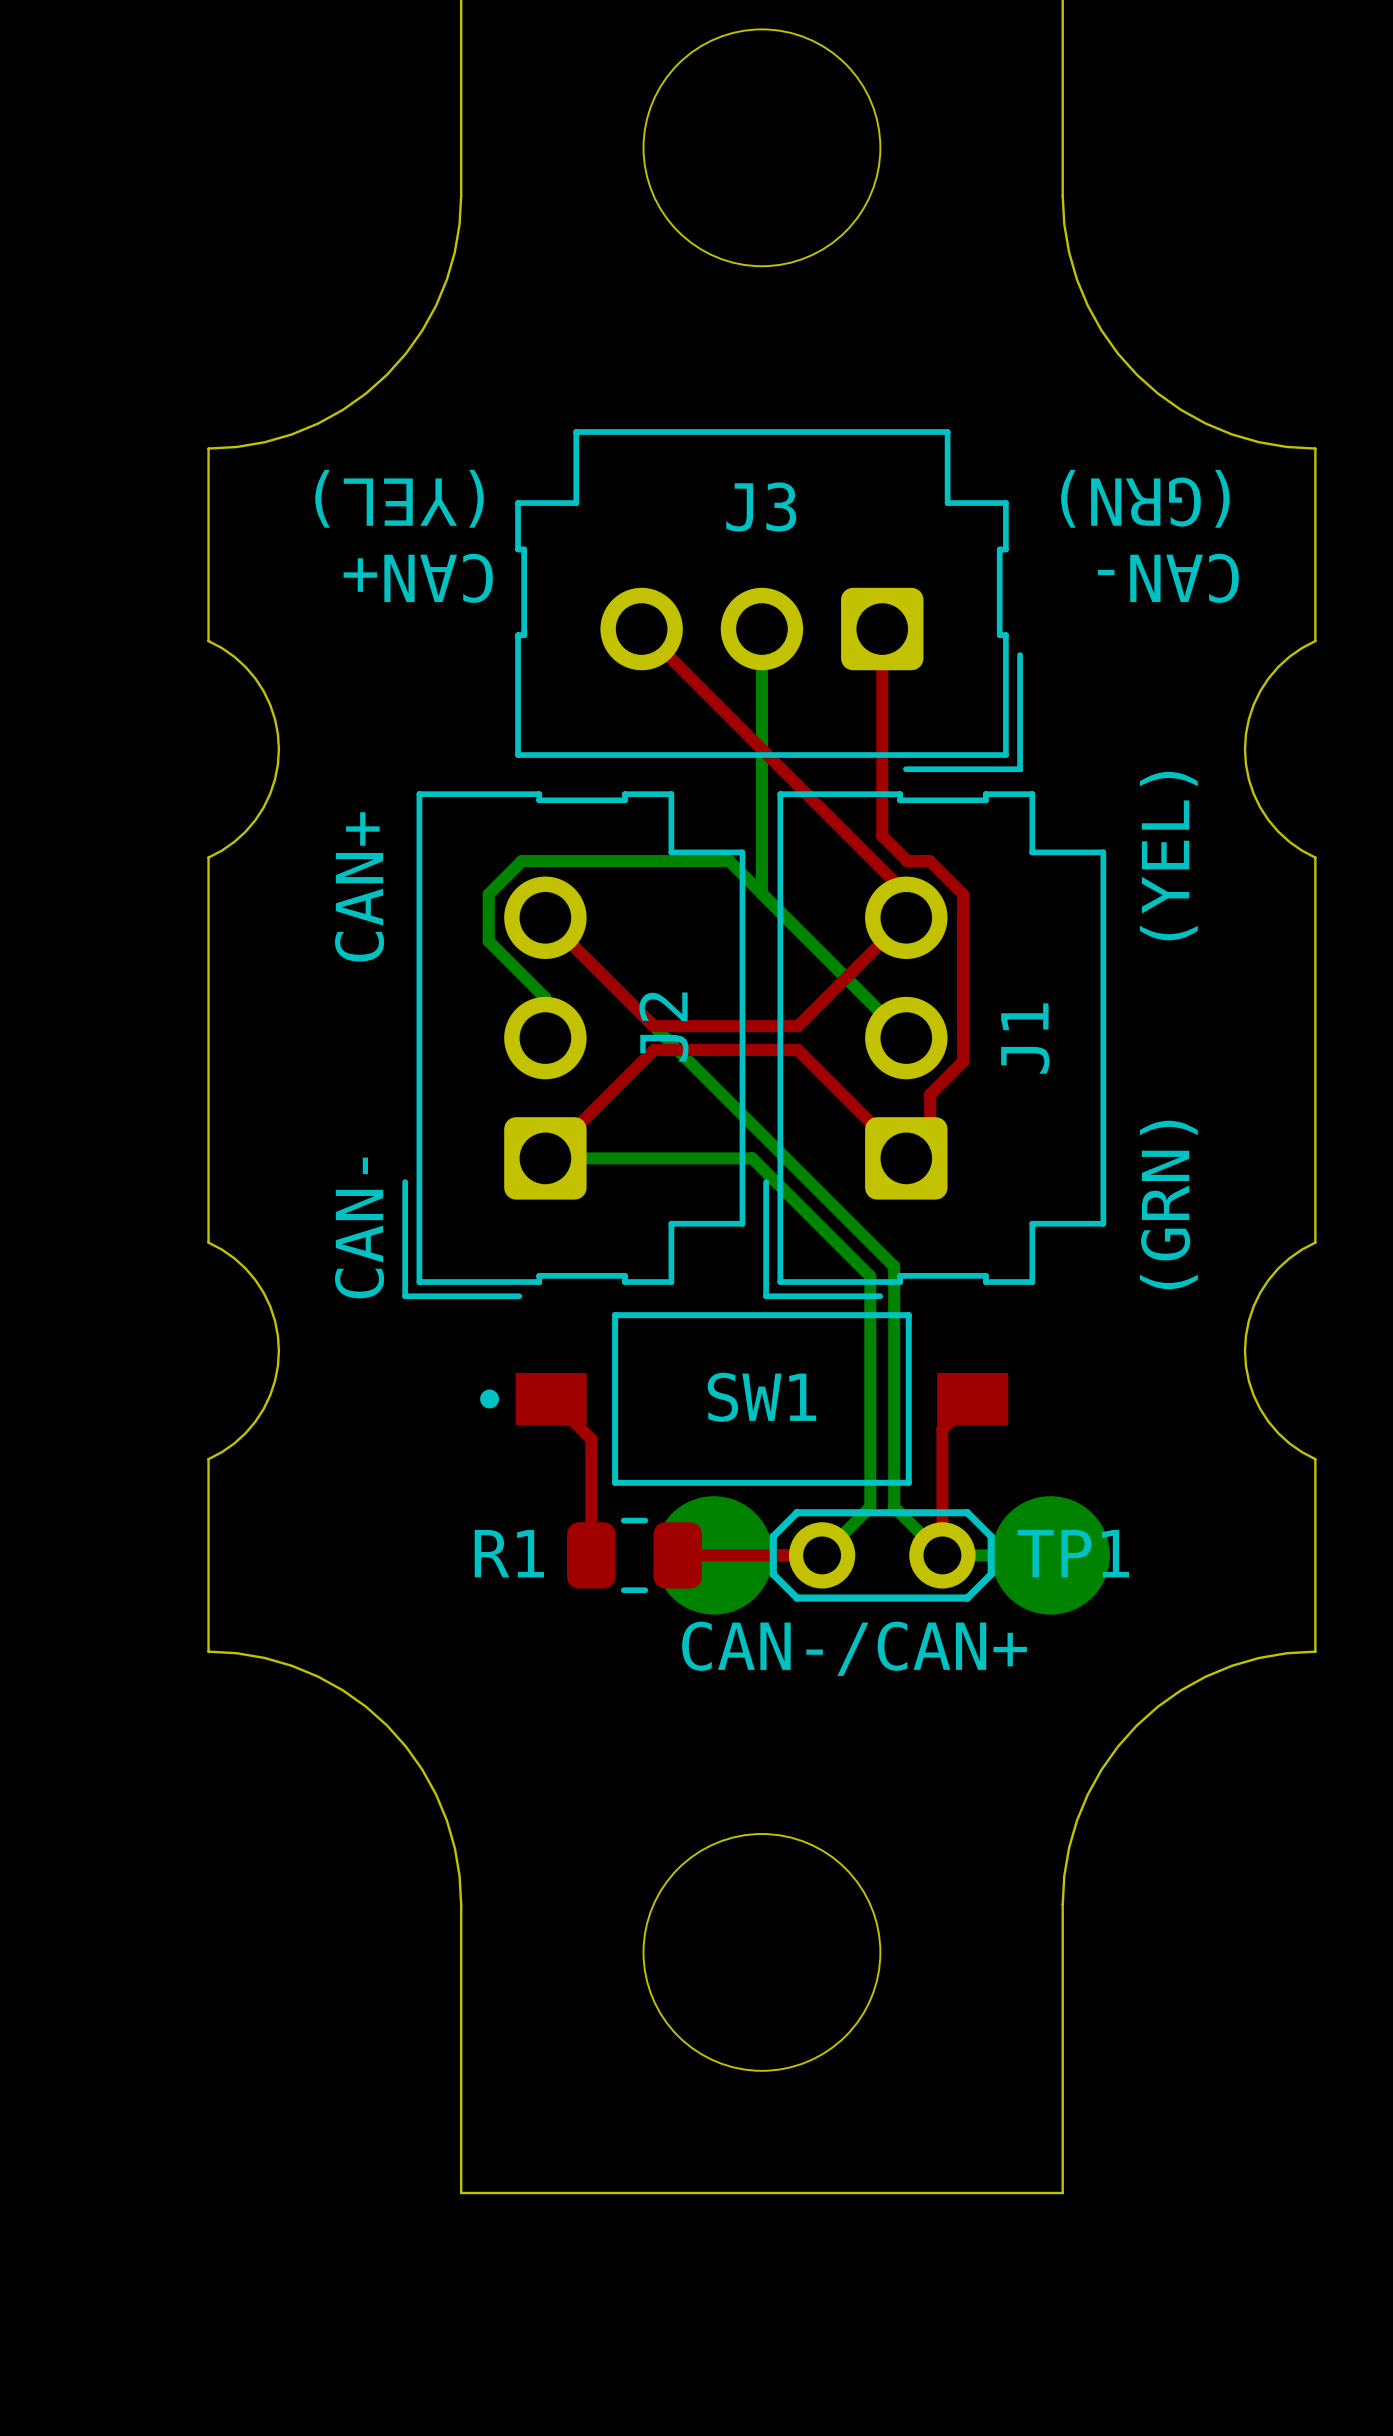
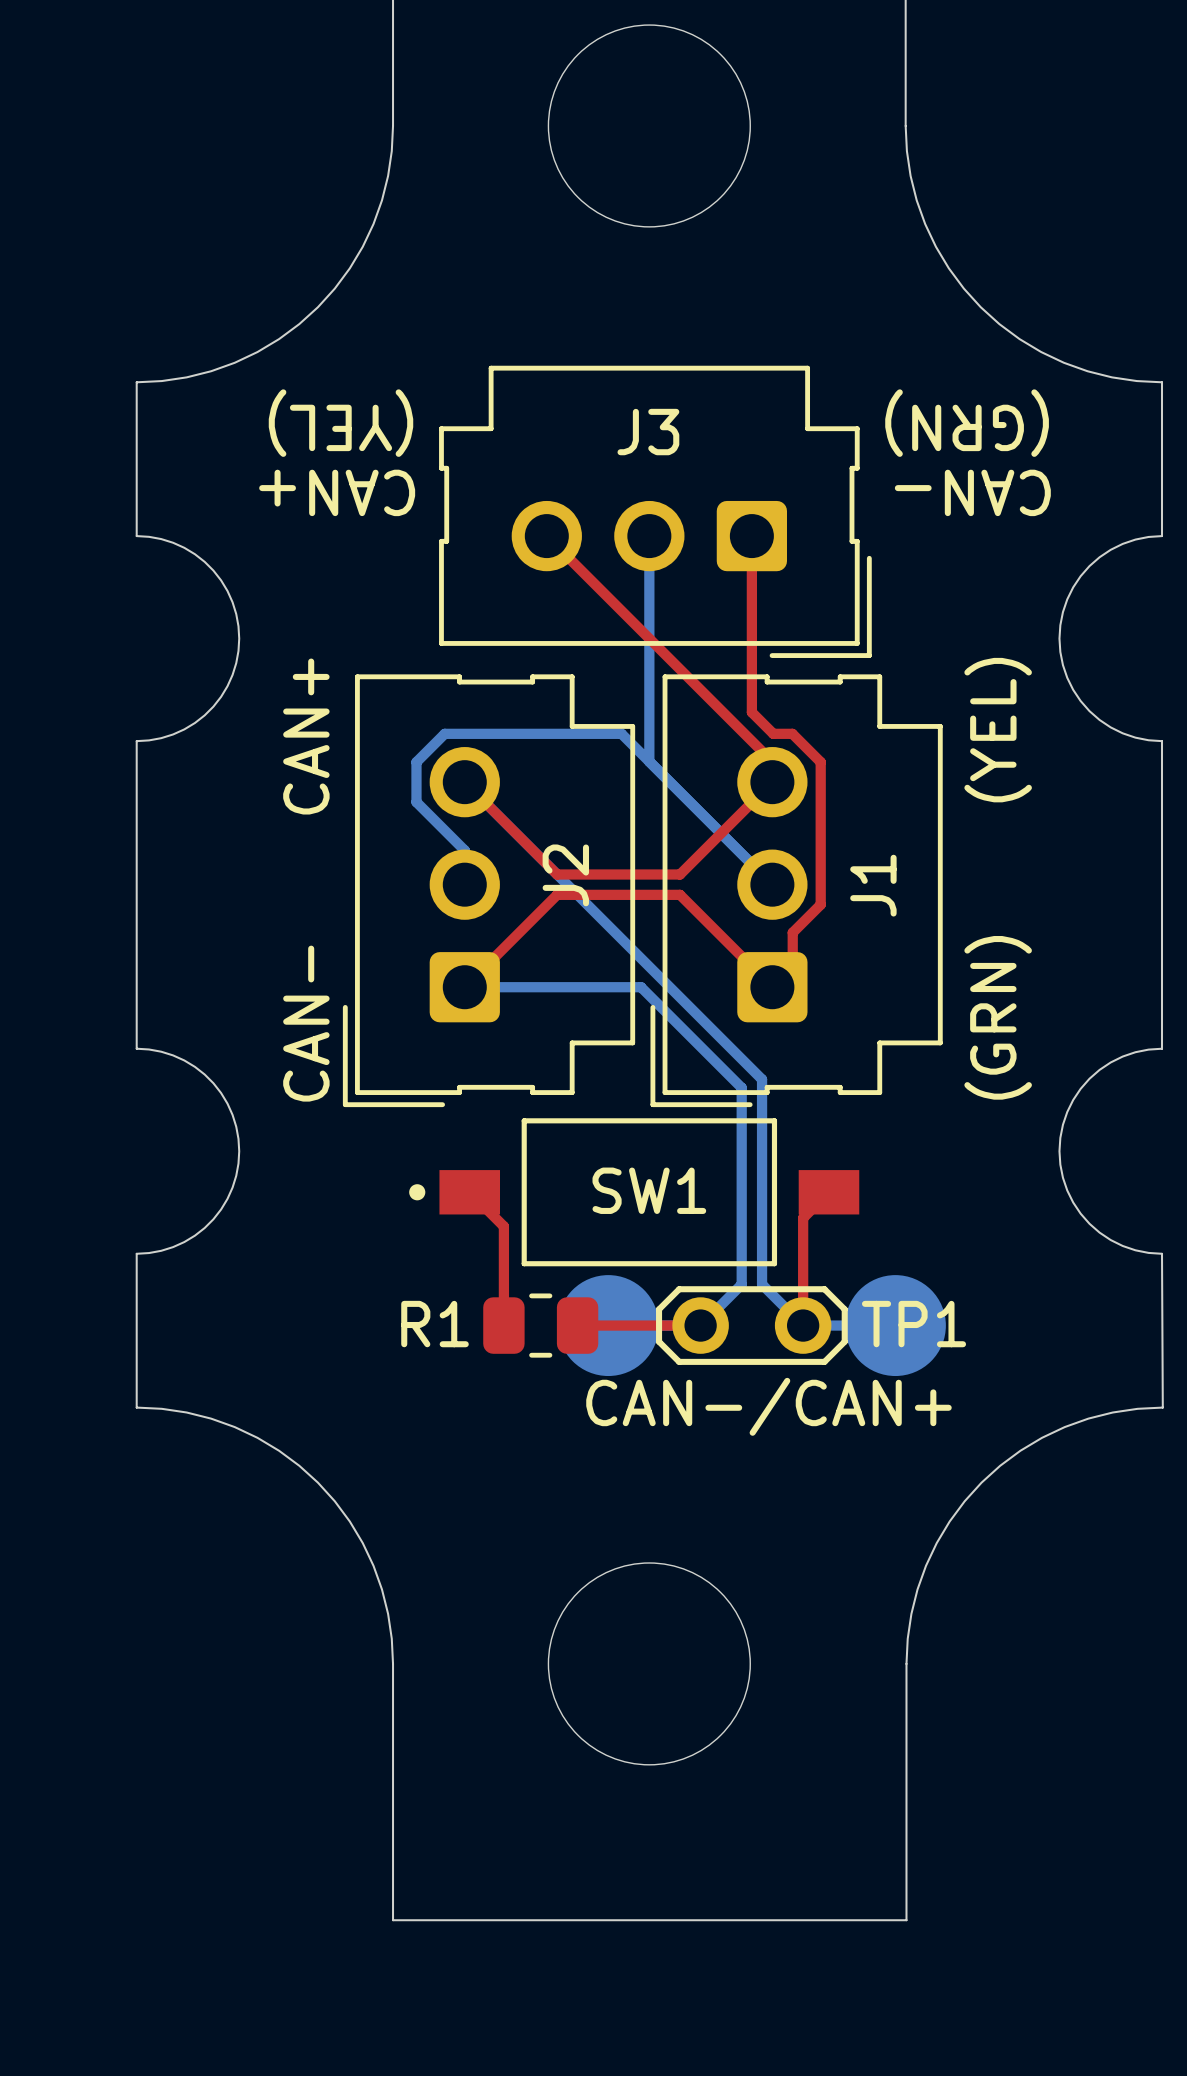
board edge: (461, 147) (459, 224) (454, 252) (447, 279) (436, 305) (422, 330) (406, 353) (387, 374) (366, 393) (342, 409) (318, 423) (291, 434) (264, 442) (236, 446) (208, 448) (208, 641) (221, 648) (245, 666) (263, 691) (275, 719) (278, 749) (275, 779) (263, 807) (255, 820) (234, 841) (208, 857) (208, 1242) (234, 1258) (245, 1268) (263, 1292) (275, 1320) (278, 1350) (275, 1380) (263, 1408) (255, 1421) (234, 1443) (208, 1459) (208, 1651) (236, 1653) (264, 1657) (291, 1665) (318, 1676) (342, 1690) (366, 1706) (387, 1725) (406, 1746) (422, 1769) (436, 1794) (447, 1820) (454, 1848) (459, 1876) (461, 1952) -> (393, 125) (388, 175) (373, 224) (349, 268) (317, 307) (279, 339) (234, 362) (186, 377) (136, 382) (136, 536) (173, 542) (204, 561) (227, 590) (236, 614) (239, 638) (236, 663) (227, 686) (204, 715) (173, 734) (136, 741) (136, 1048) (173, 1055) (204, 1074) (221, 1093) (232, 1114) (239, 1151) (232, 1187) (213, 1219) (184, 1242) (161, 1250) (136, 1253) (136, 1407) (186, 1412) (234, 1427) (279, 1450) (317, 1482) (349, 1521) (373, 1565) (388, 1613) (393, 1663)
board edge: (1062, 147) (1064, 224) (1069, 252) (1076, 279) (1087, 305) (1101, 330) (1117, 353) (1136, 374) (1157, 393) (1180, 409) (1205, 423) (1231, 434) (1259, 442) (1287, 446) (1315, 448) (1315, 641) (1289, 656) (1278, 666) (1260, 691) (1248, 719) (1244, 749) (1248, 779) (1253, 793) (1268, 820) (1289, 841) (1315, 857) (1315, 1242) (1289, 1258) (1278, 1268) (1260, 1292) (1248, 1320) (1244, 1350) (1248, 1380) (1253, 1395) (1268, 1421) (1289, 1443) (1315, 1459) (1315, 1651) (1287, 1653) (1259, 1657) (1231, 1665) (1205, 1676) (1180, 1690) (1157, 1706) (1136, 1725) (1117, 1746) (1101, 1769) (1087, 1794) (1076, 1820) (1069, 1848) (1064, 1876) (1062, 2193) (461, 2193) -> (905, 125) (910, 175) (925, 224) (948, 268) (980, 307) (1019, 339) (1063, 362) (1111, 377) (1162, 382) (1162, 536) (1135, 539) (1122, 543) (1099, 557) (1089, 566) (1073, 587) (1067, 599) (1062, 612) (1059, 638) (1062, 665) (1067, 677) (1073, 689) (1089, 711) (1099, 719) (1122, 733) (1148, 740) (1162, 741) (1162, 1048) (1135, 1052) (1122, 1056) (1110, 1062) (1089, 1078) (1073, 1099) (1067, 1112) (1060, 1137) (1059, 1151) (1060, 1164) (1067, 1190) (1073, 1202) (1089, 1223) (1110, 1240) (1122, 1245) (1135, 1250) (1162, 1253) (1162, 1407) (1112, 1412) (1088, 1418) (1041, 1437) (1000, 1465) (981, 1482) (964, 1501) (936, 1543) (917, 1589) (907, 1638) (906, 1920) (393, 1920) (393, 1868)

